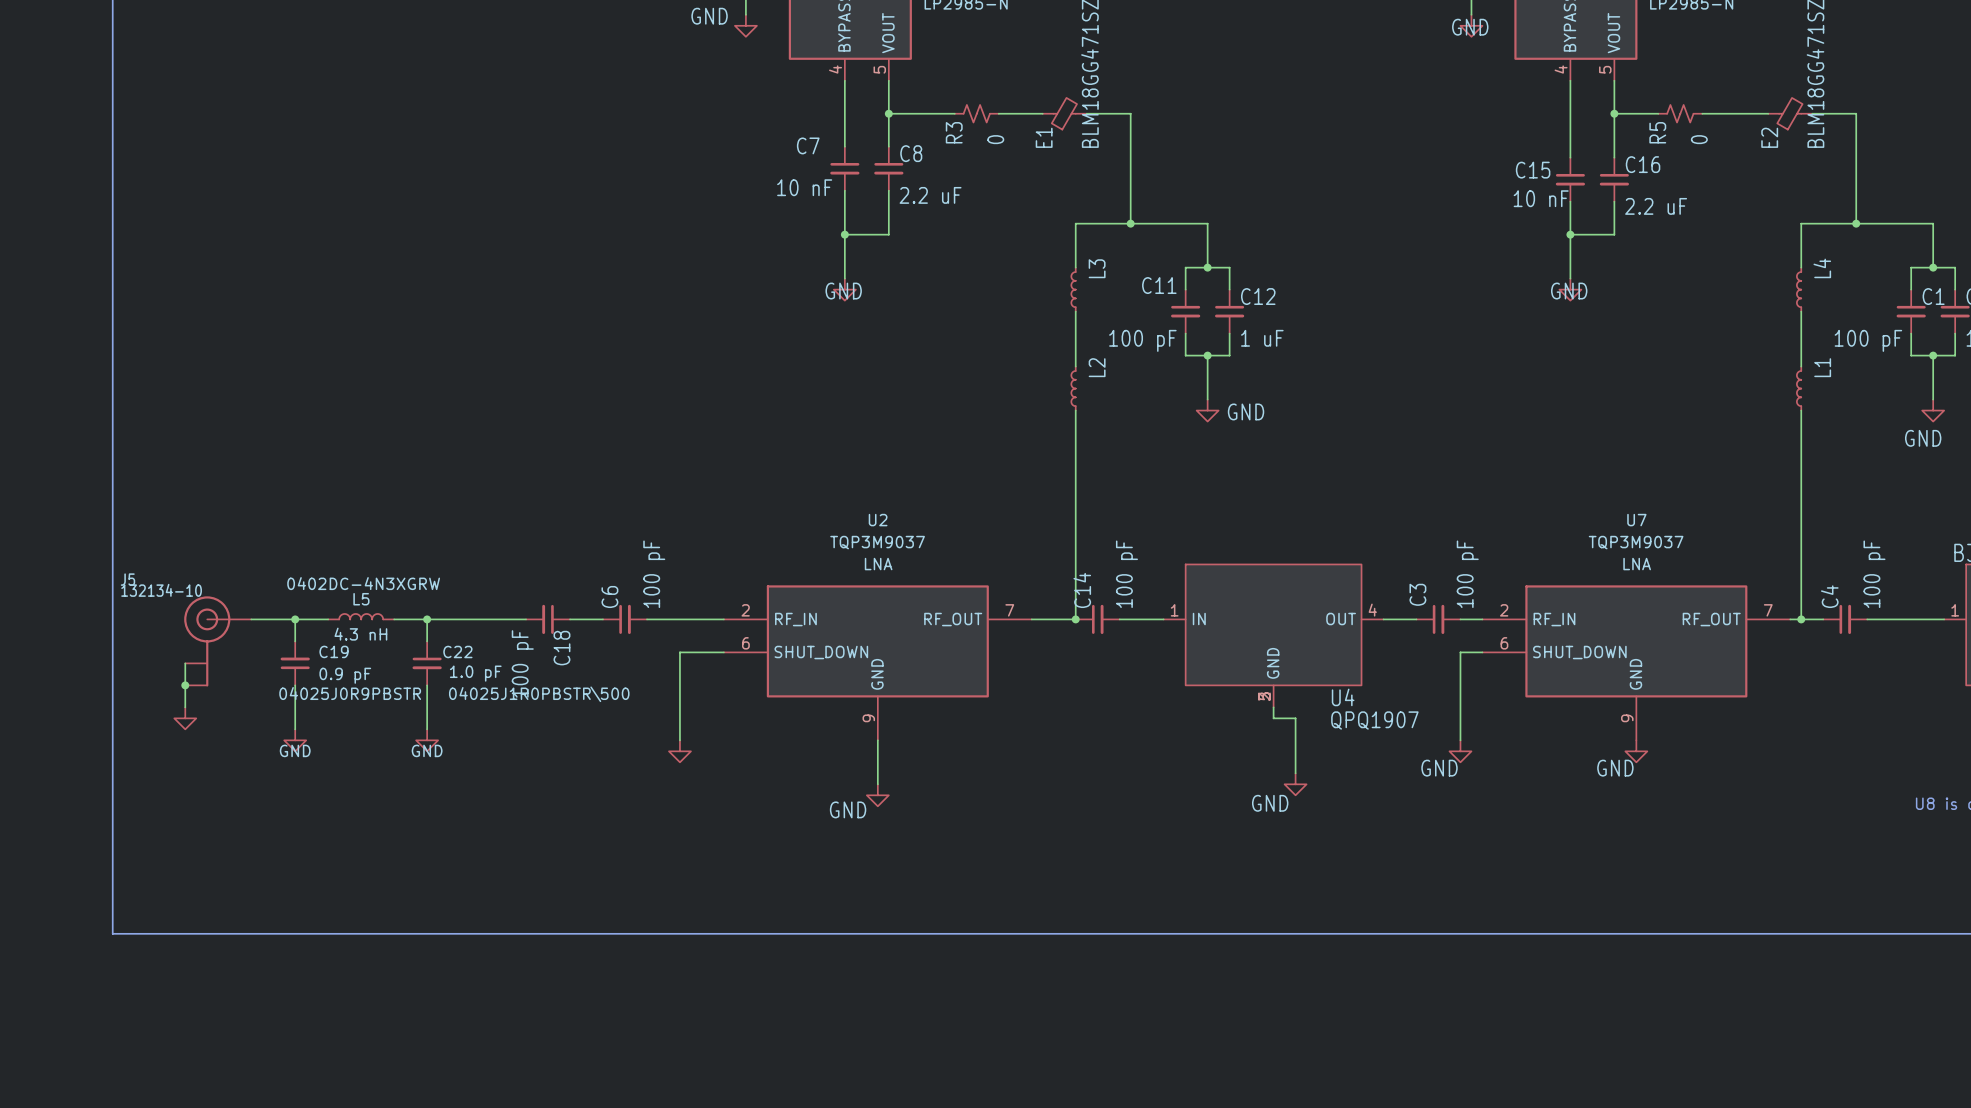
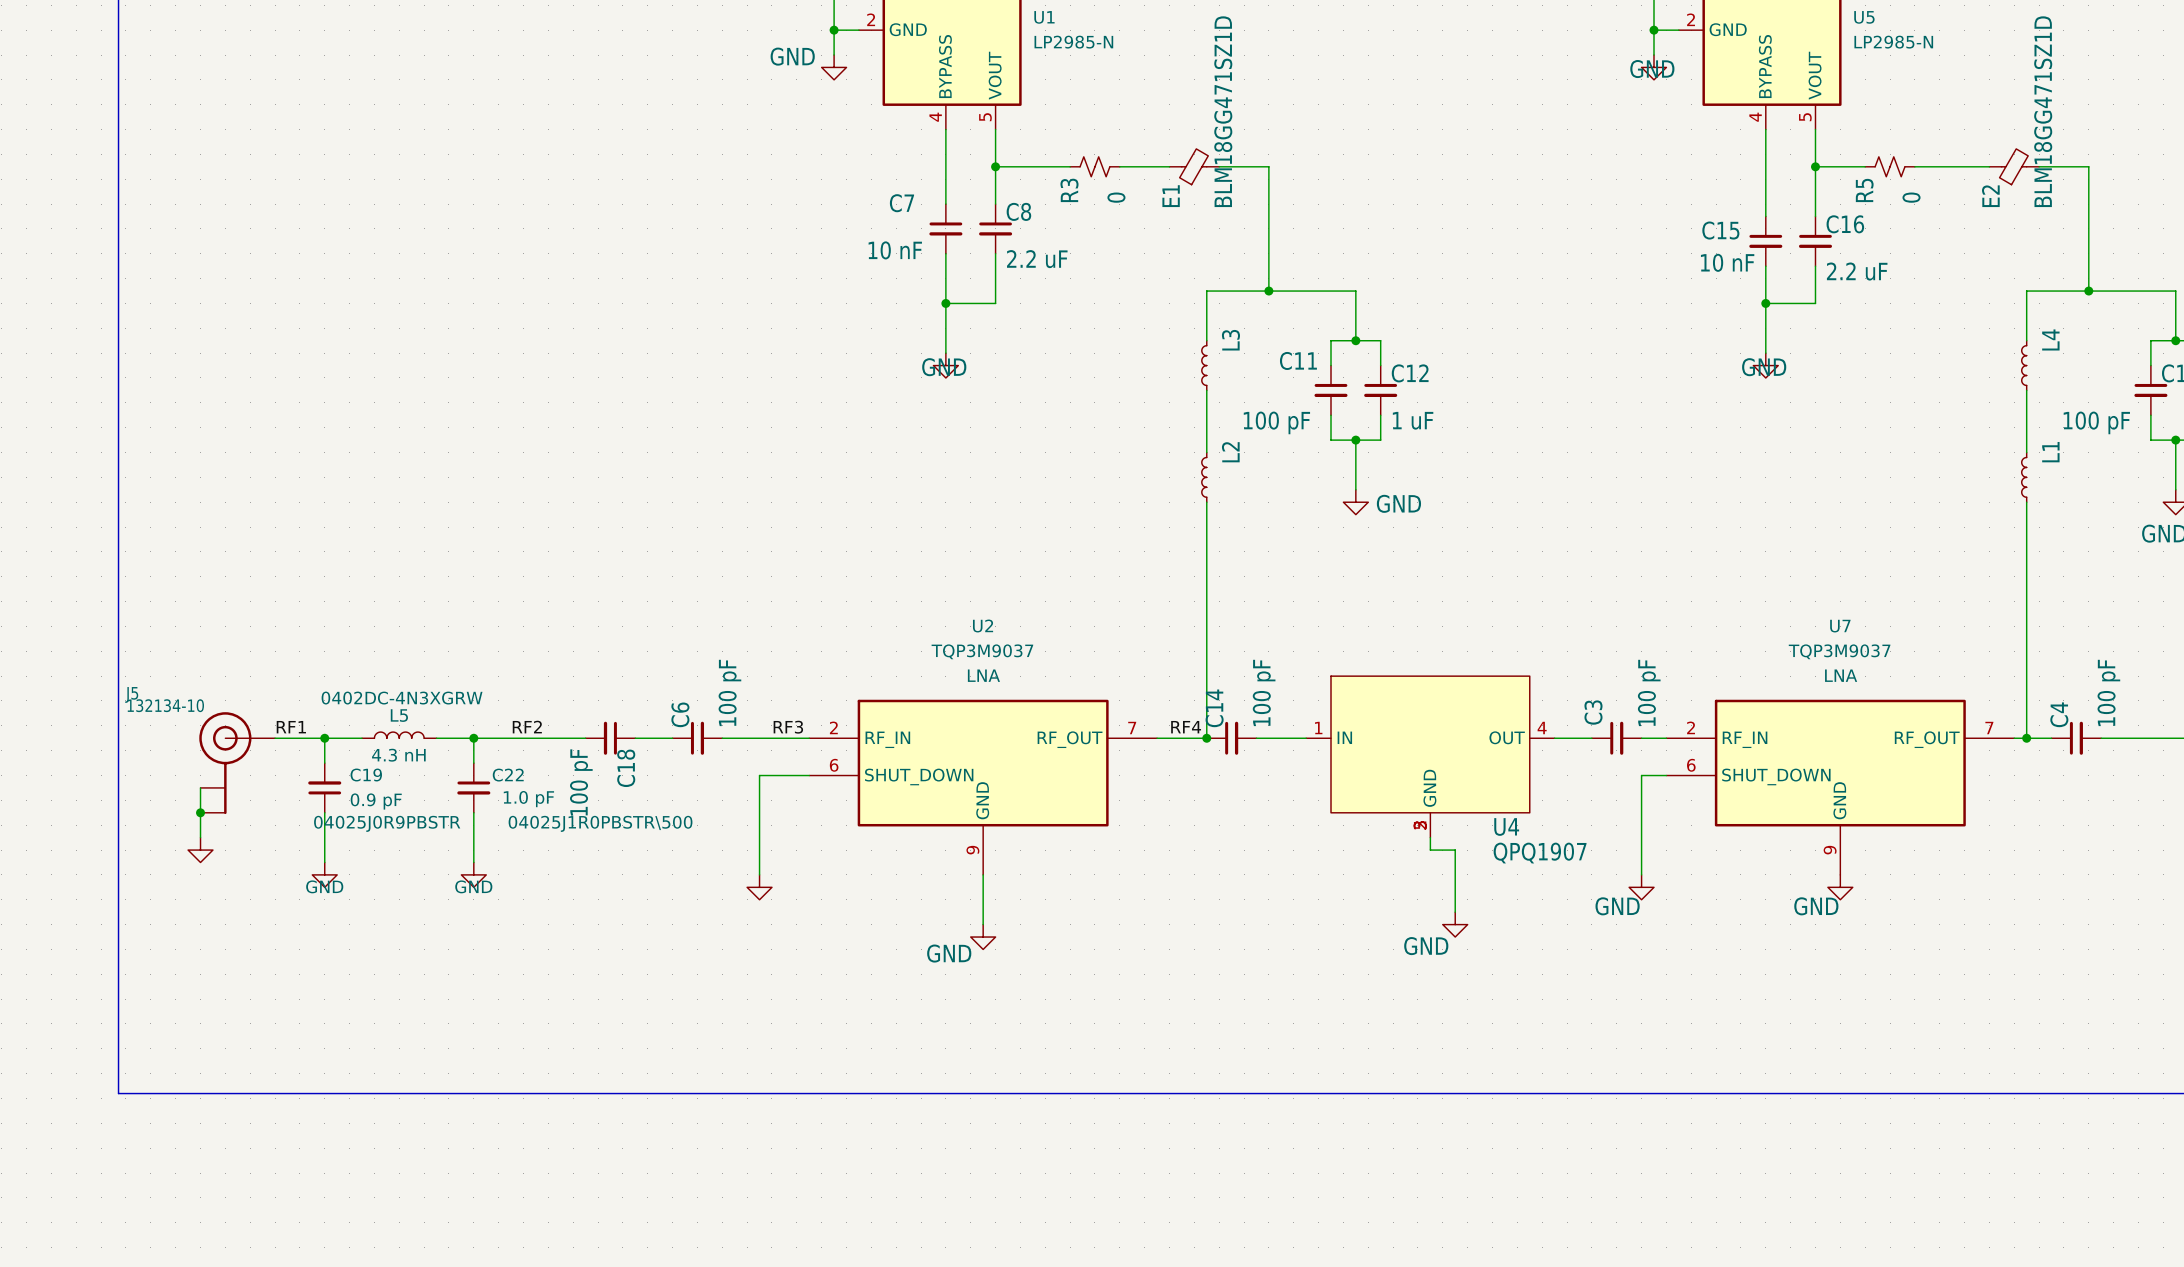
label: none -> RF1 (291, 727)
label: none -> RF2 (527, 727)
label: none -> RF3 (788, 727)
label: none -> RF4 (1186, 727)

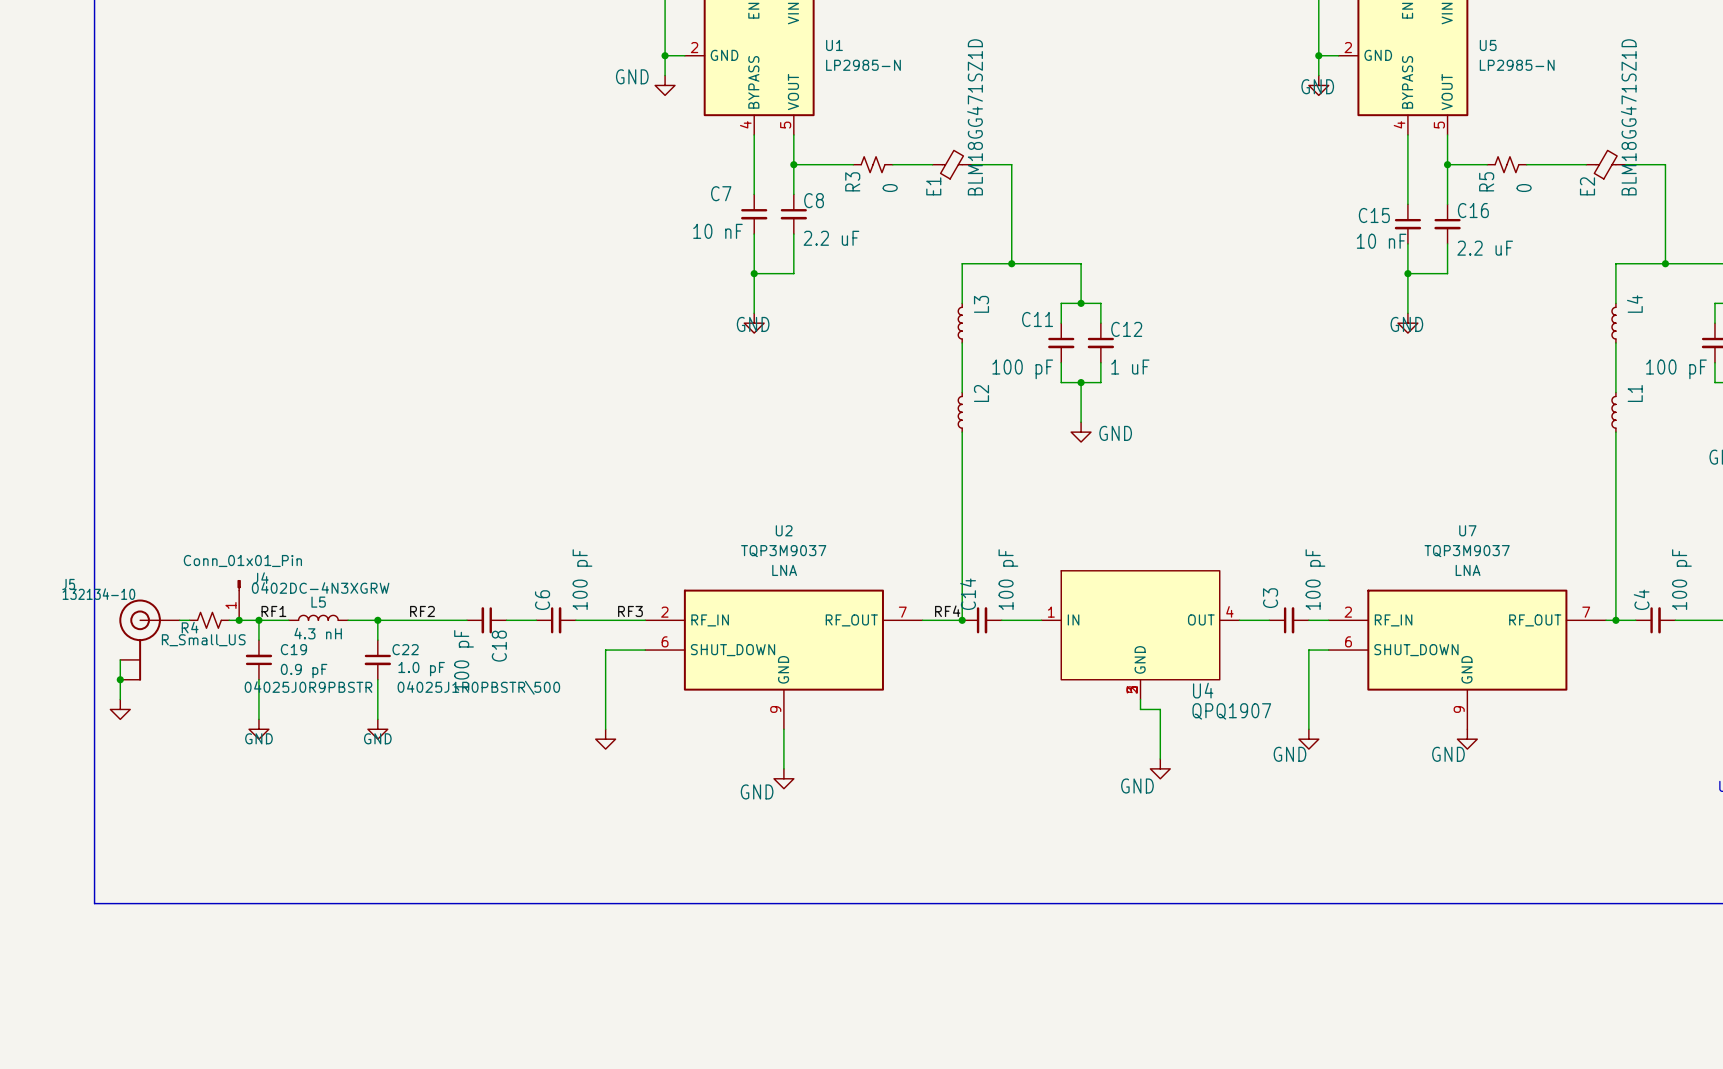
J4: none -> Conn_01x01_Pin (239, 600)
label position: RF1 (291, 727) -> RF1 (273, 611)
R4: none -> R_Small_US (209, 620)
junction: none -> (239, 620)
J5 position: (237, 763) -> (149, 640)
wire: (200, 787) (200, 837) -> (120, 659) (120, 699)
junction position: (200, 812) -> (120, 679)
power symbol position: (200, 850) -> (120, 709)

